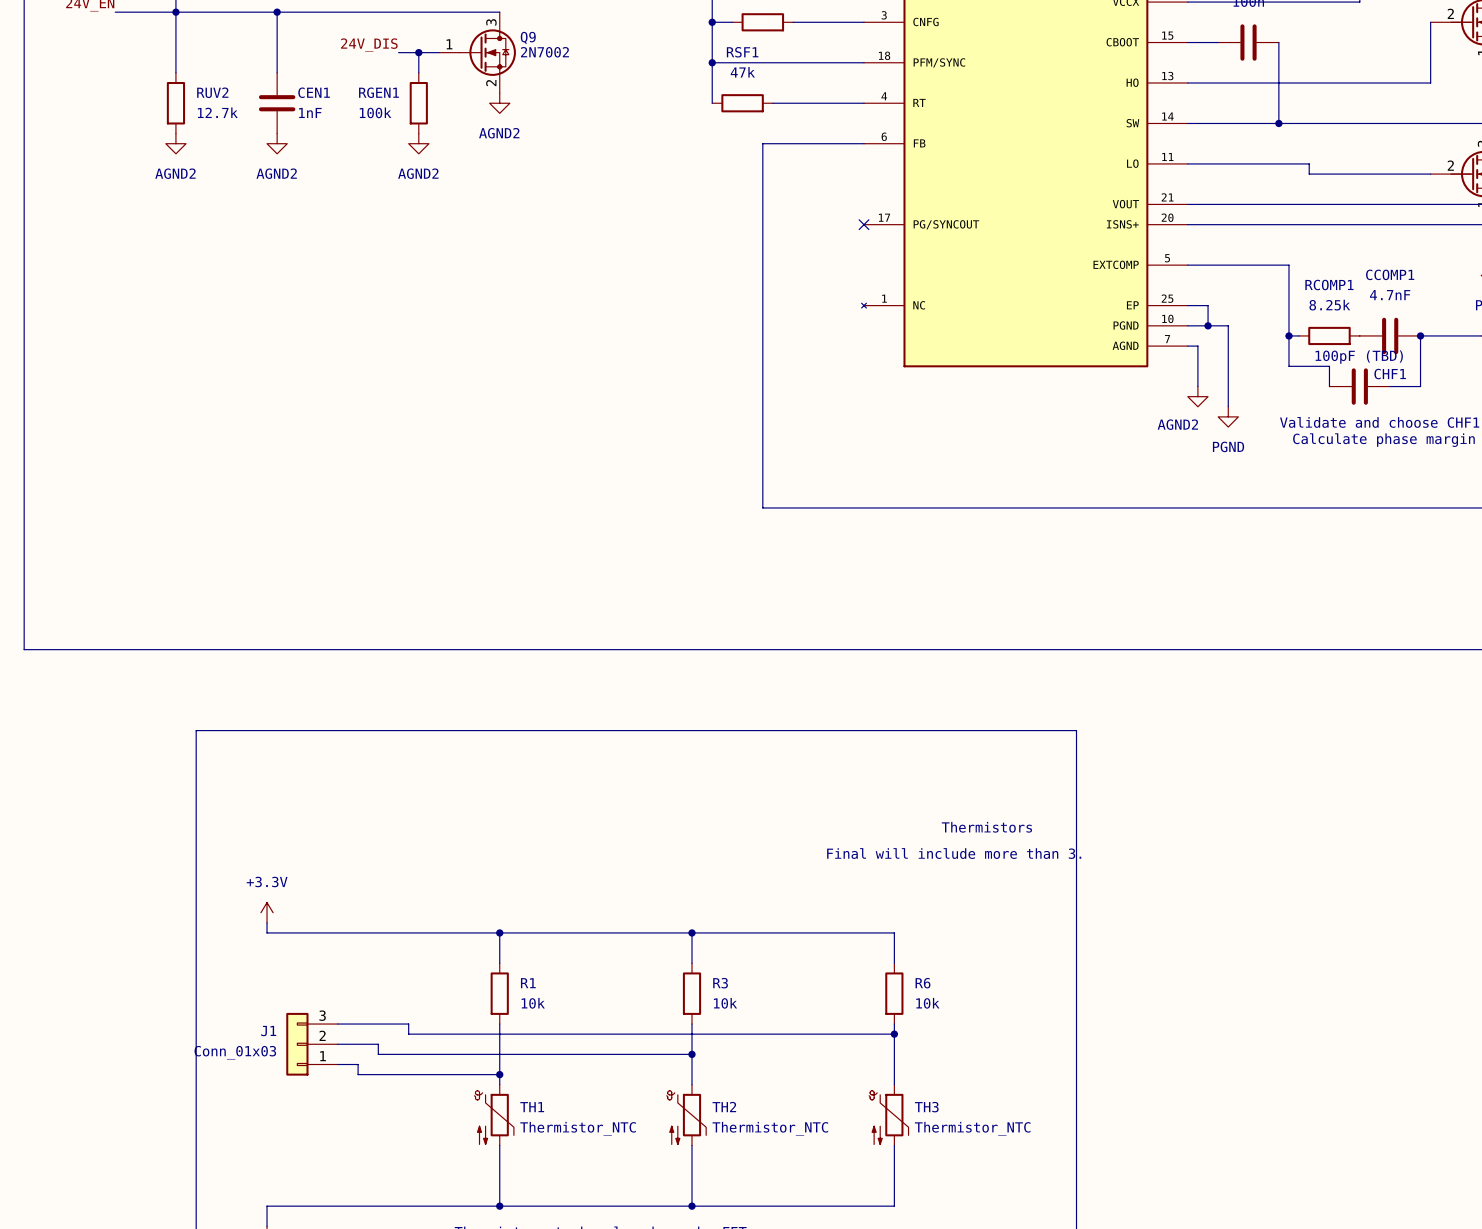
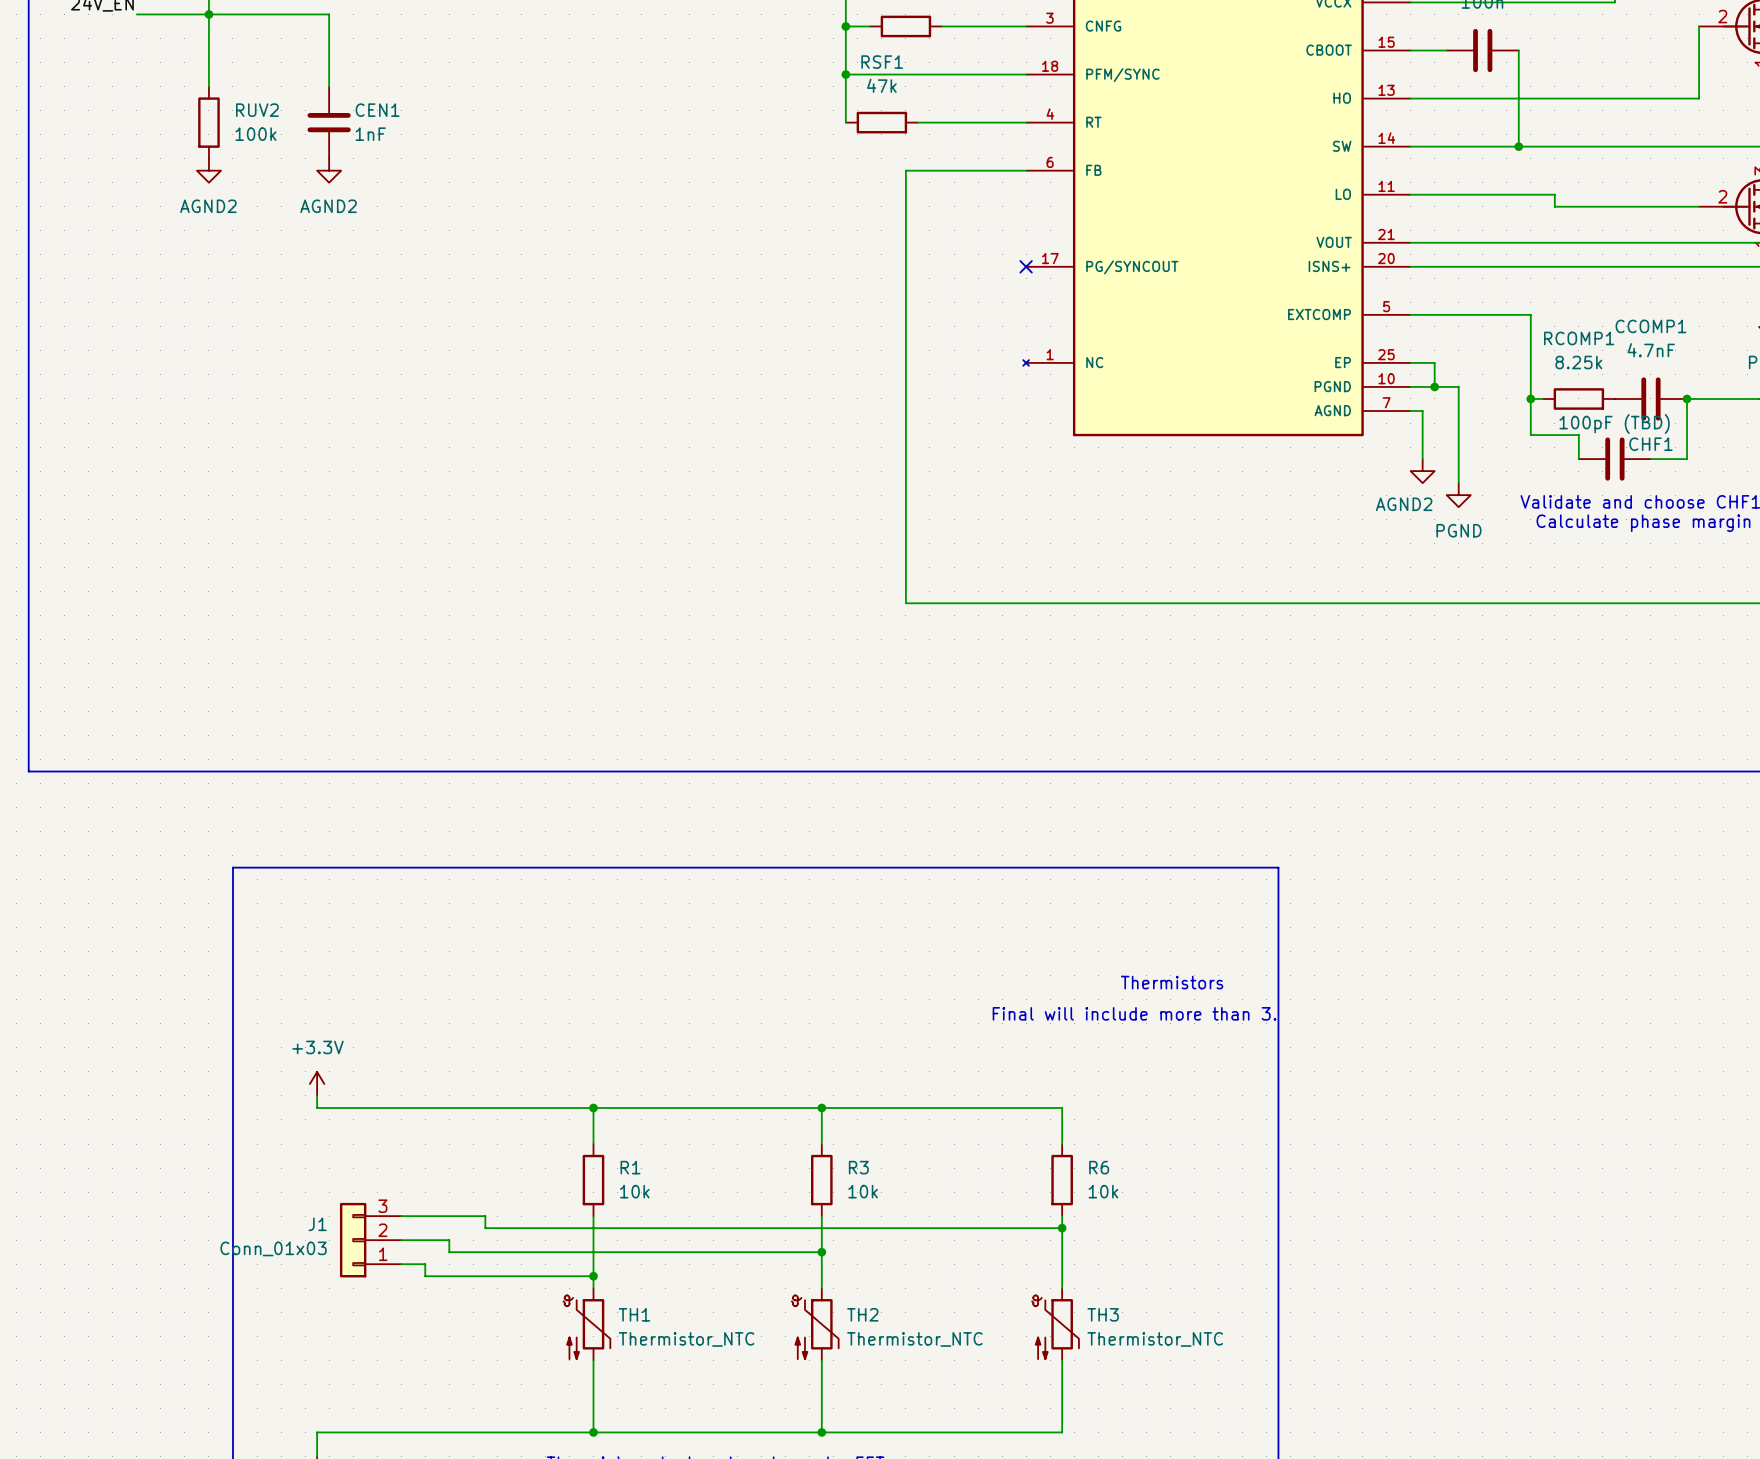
wire: (277, 12) (499, 12) -> none
junction: (277, 12) -> none
label: 24V_DIS (369, 45) -> none
wire: (398, 52) (439, 52) -> none
wire: (418, 52) (418, 72) -> none
junction: (418, 52) -> none
Q9: 2N7002 (477, 52) -> none
RGEN1: 100k (418, 103) -> none
power symbol: AGND2 (499, 103) -> none
RUV2 value: 12.7k (217, 112) -> 100k (255, 134)
power symbol: AGND2 (418, 143) -> none

